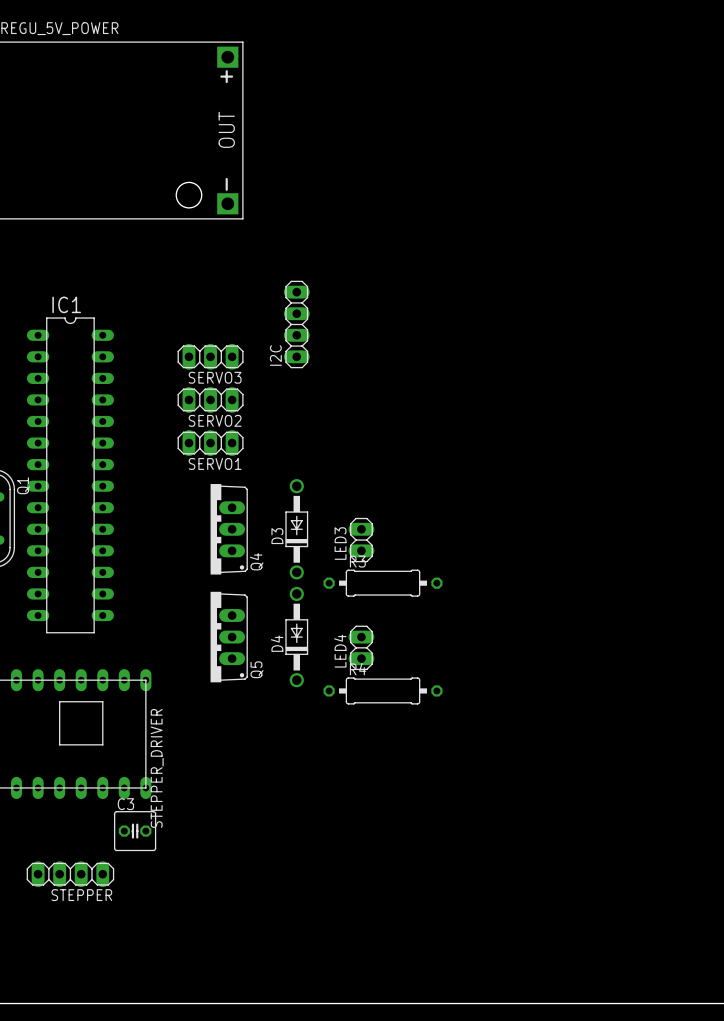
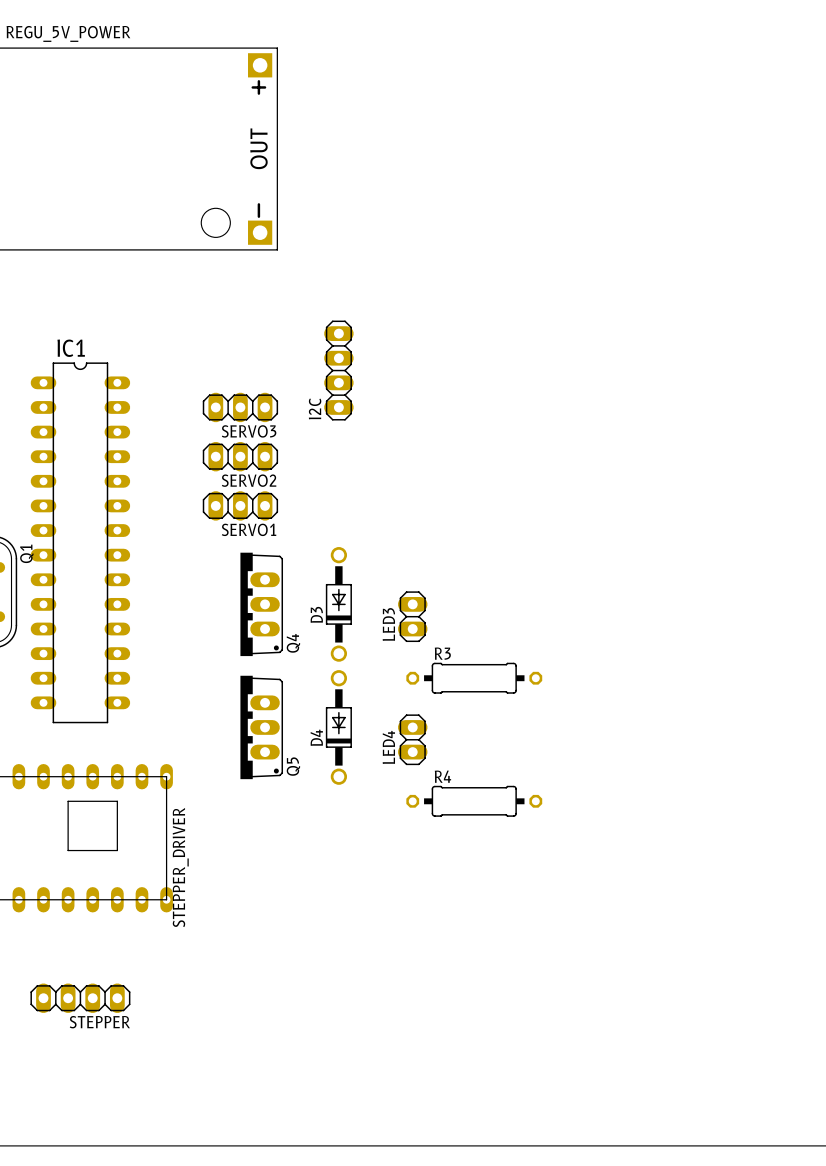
R3 position: (383, 583) -> (474, 678)
R4 position: (383, 690) -> (474, 801)
C3: (135, 831) -> none

